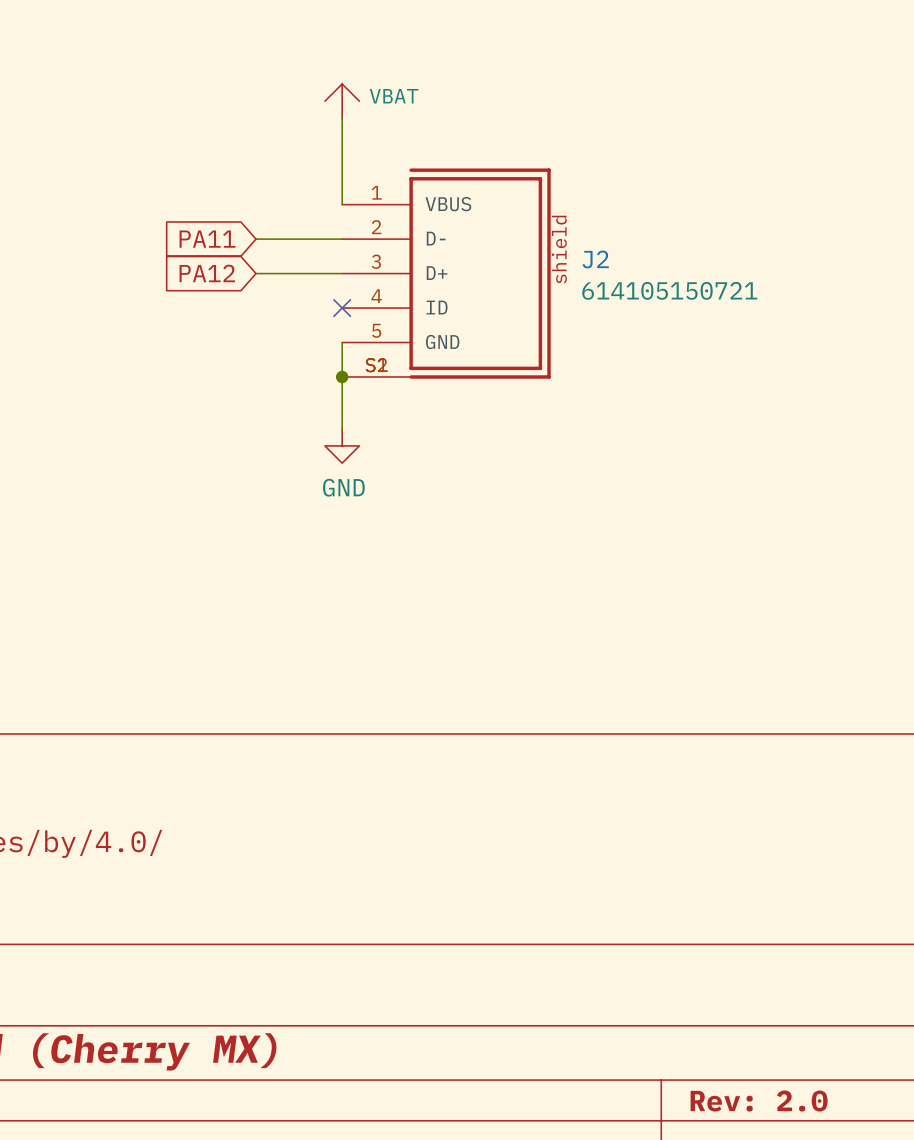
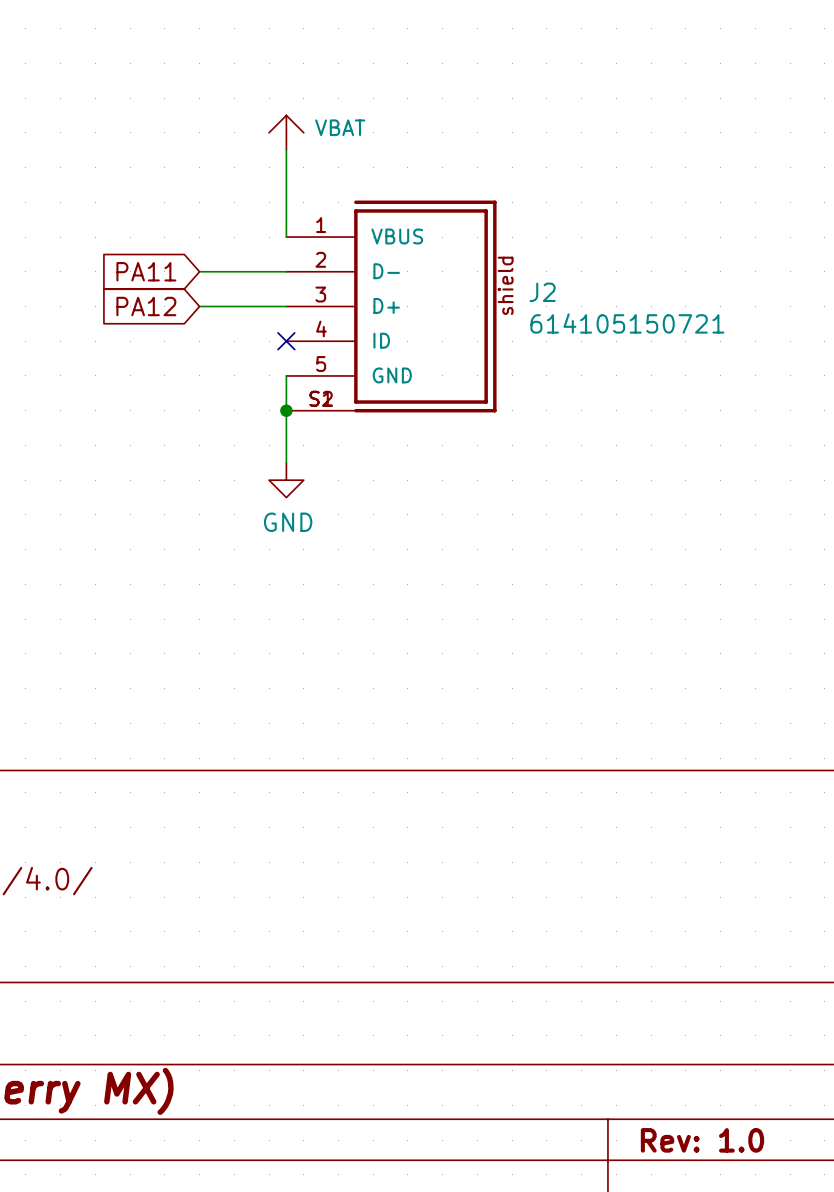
title block: Rev: 2.0 (759, 1101) -> Rev: 1.0 (702, 1140)

